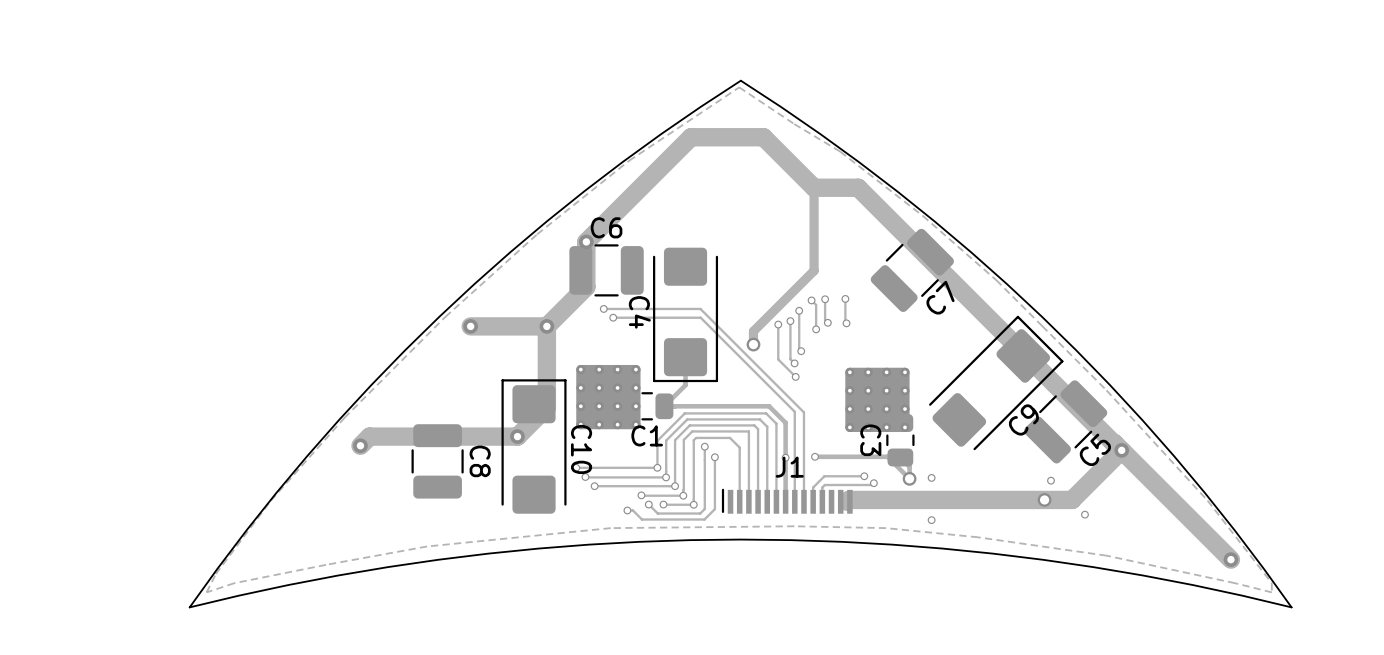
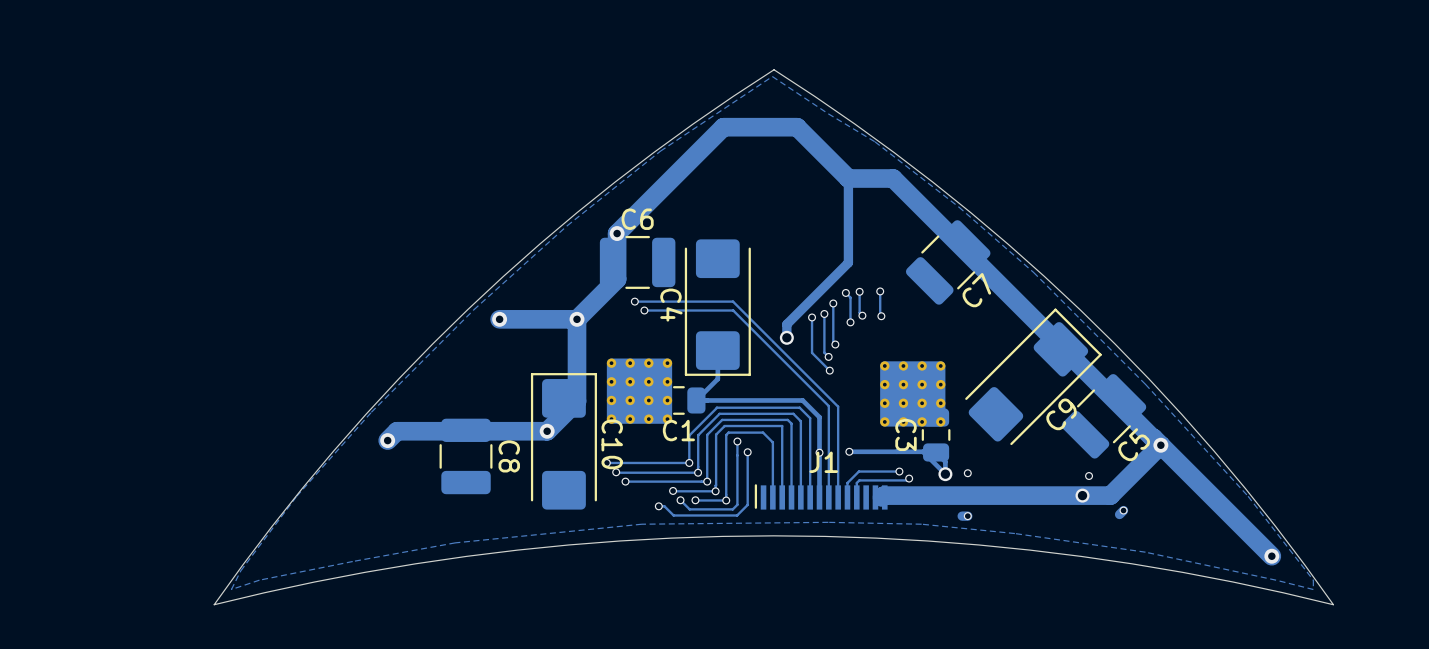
track: none -> (1123, 510) (1119, 514)
track: none -> (967, 516) (962, 516)

